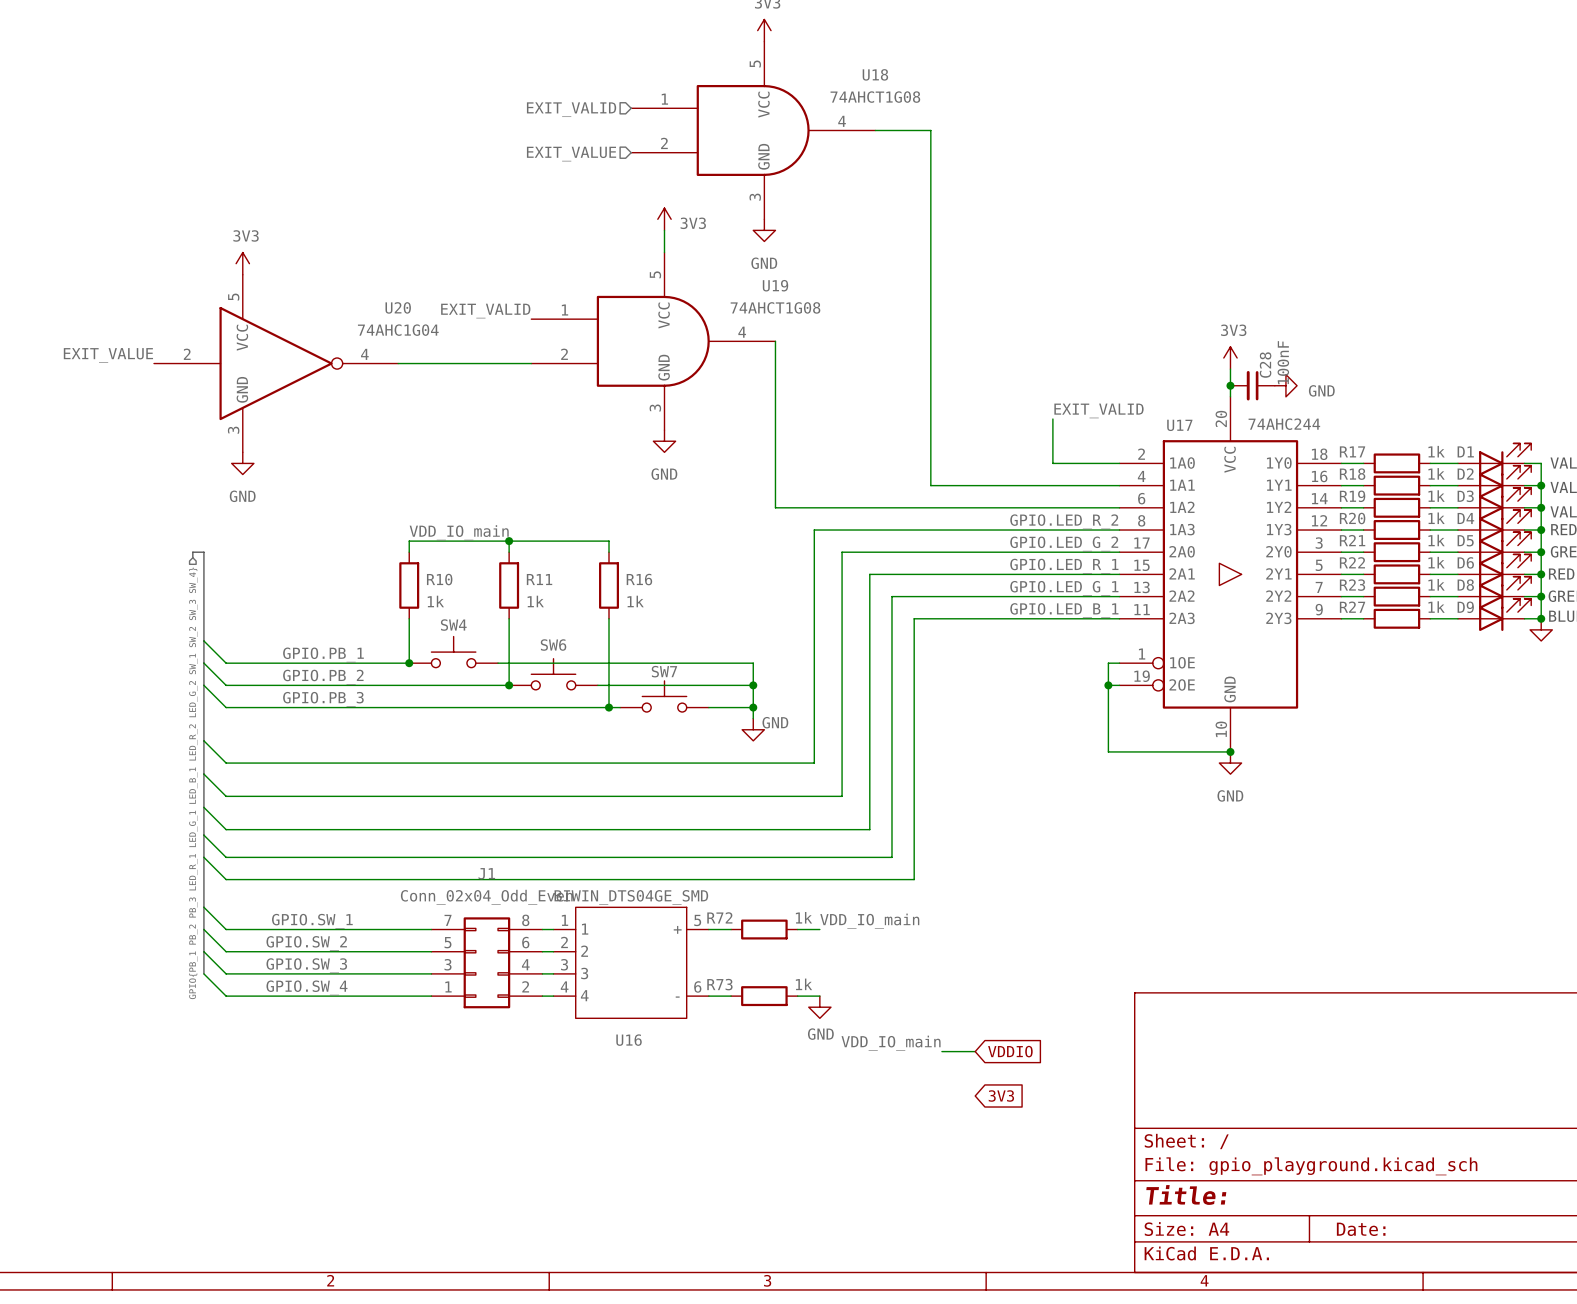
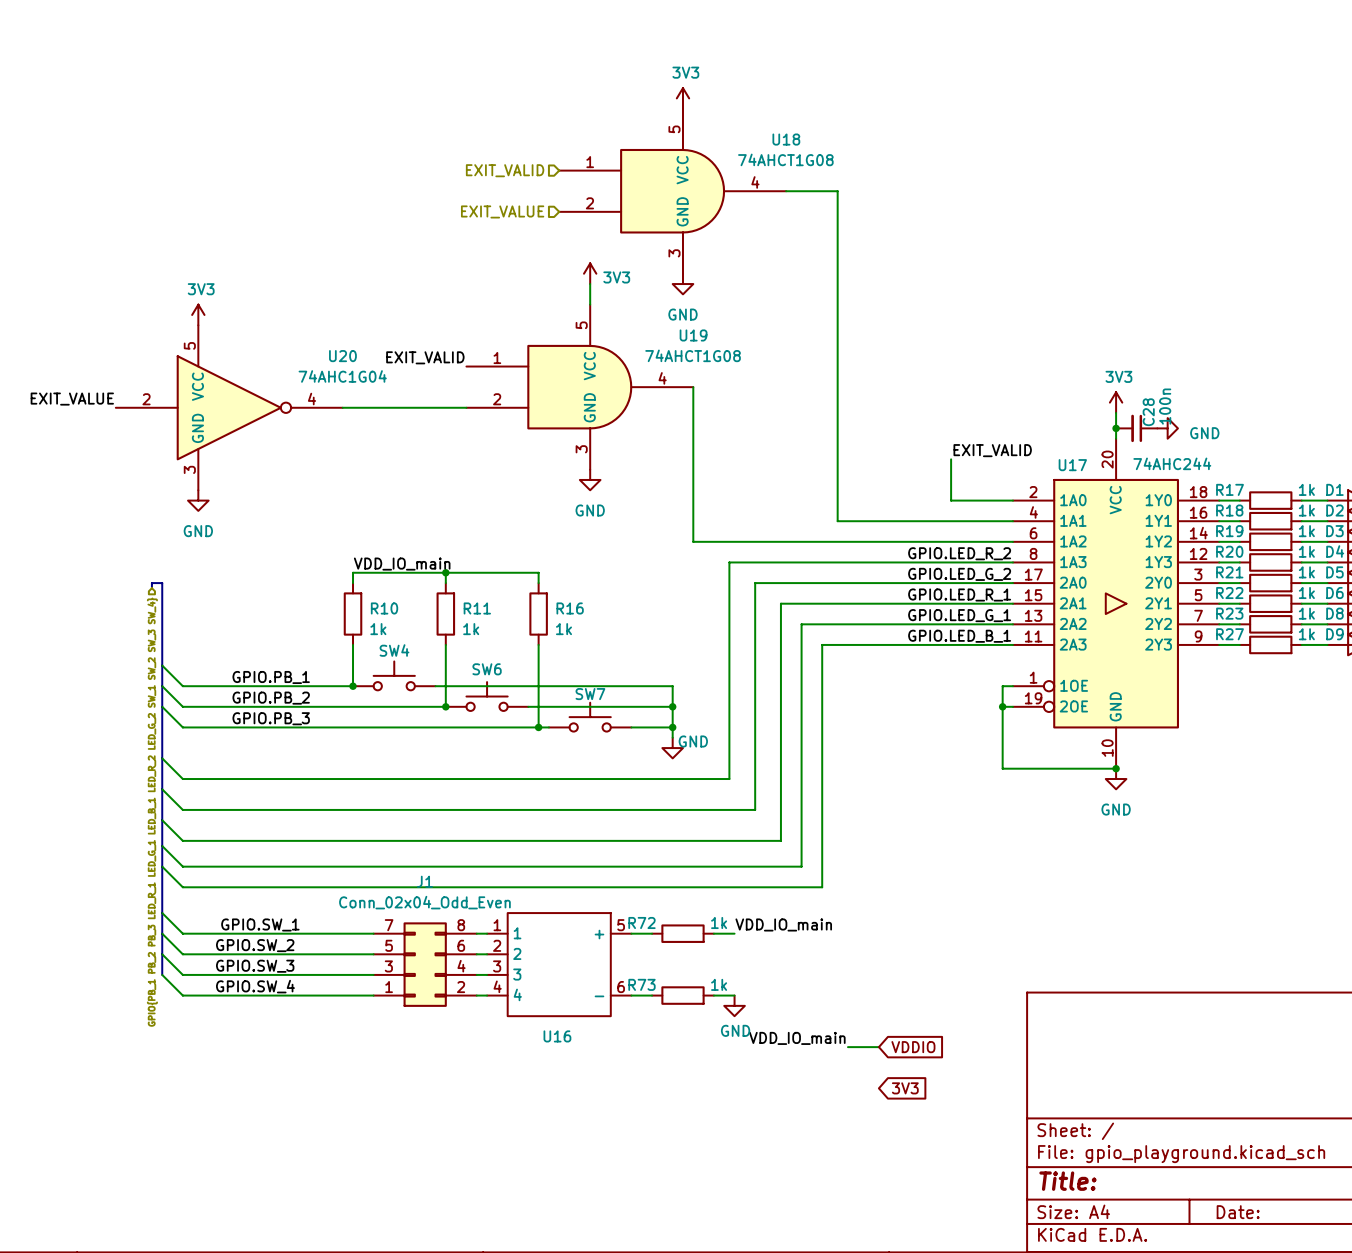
C28 value: 100nF (1283, 362) -> 100n (1165, 406)
U16 value: BIWIN_DTS04GE_SMD (631, 897) -> none

